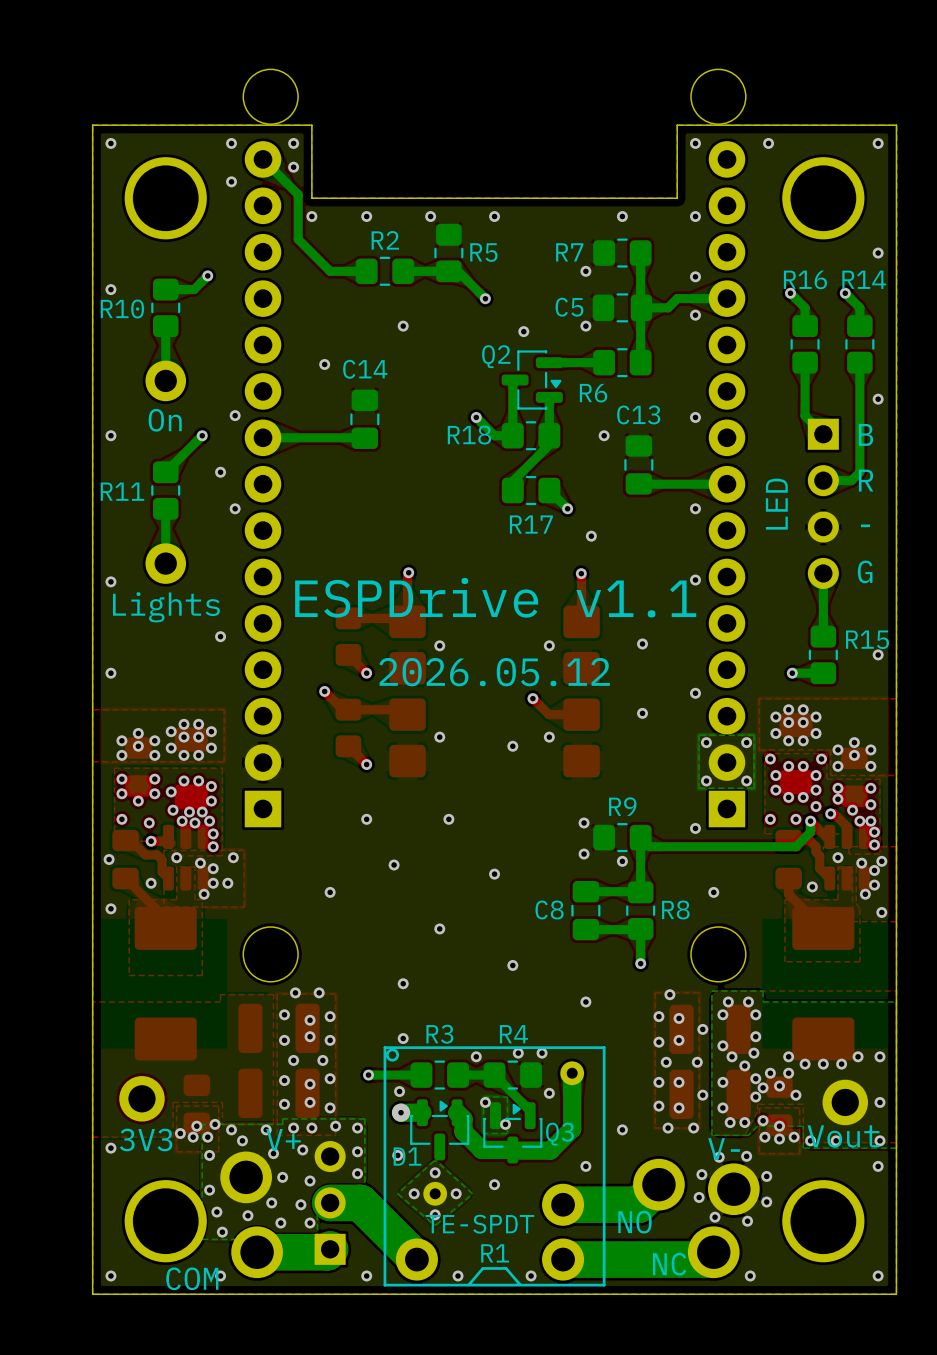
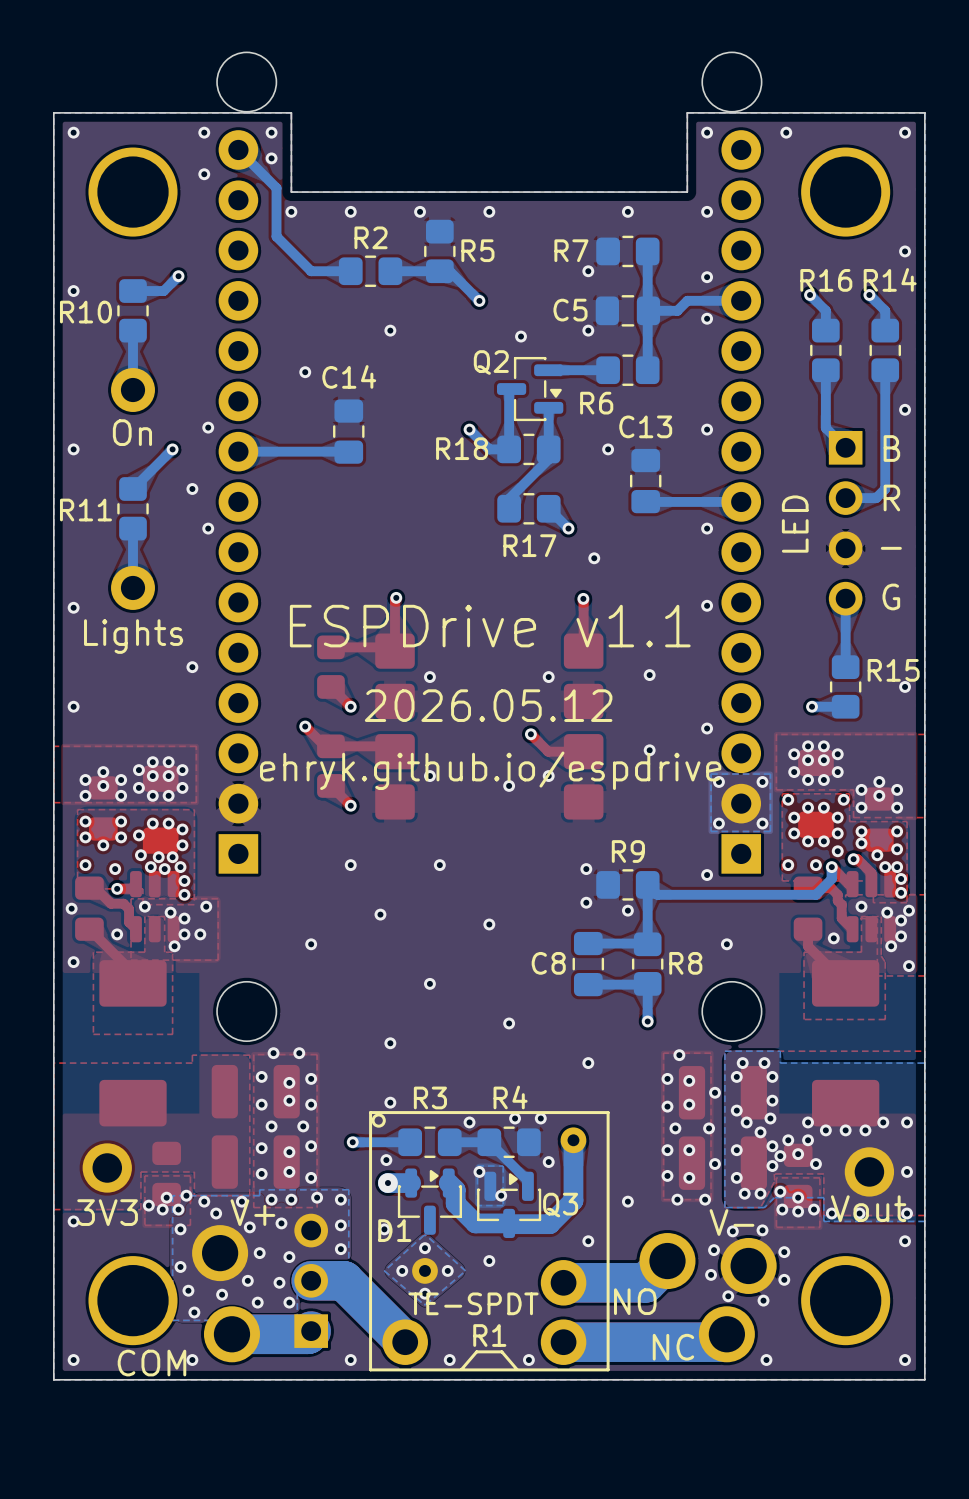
text: none -> ehryk.github.io/espdrive (490, 770)

